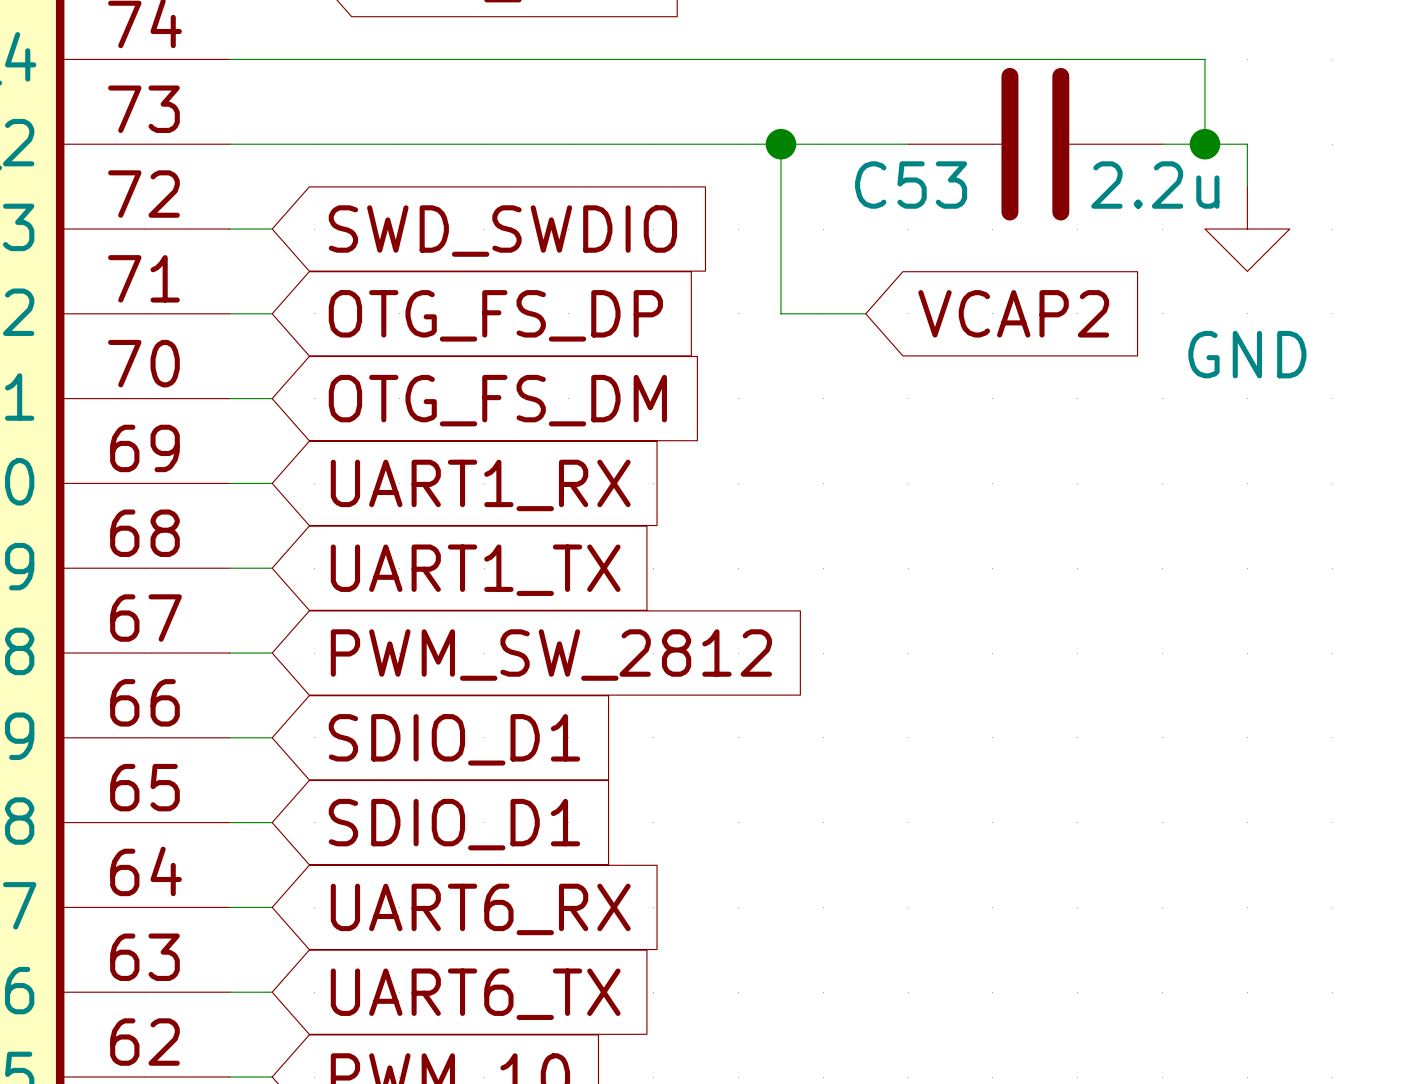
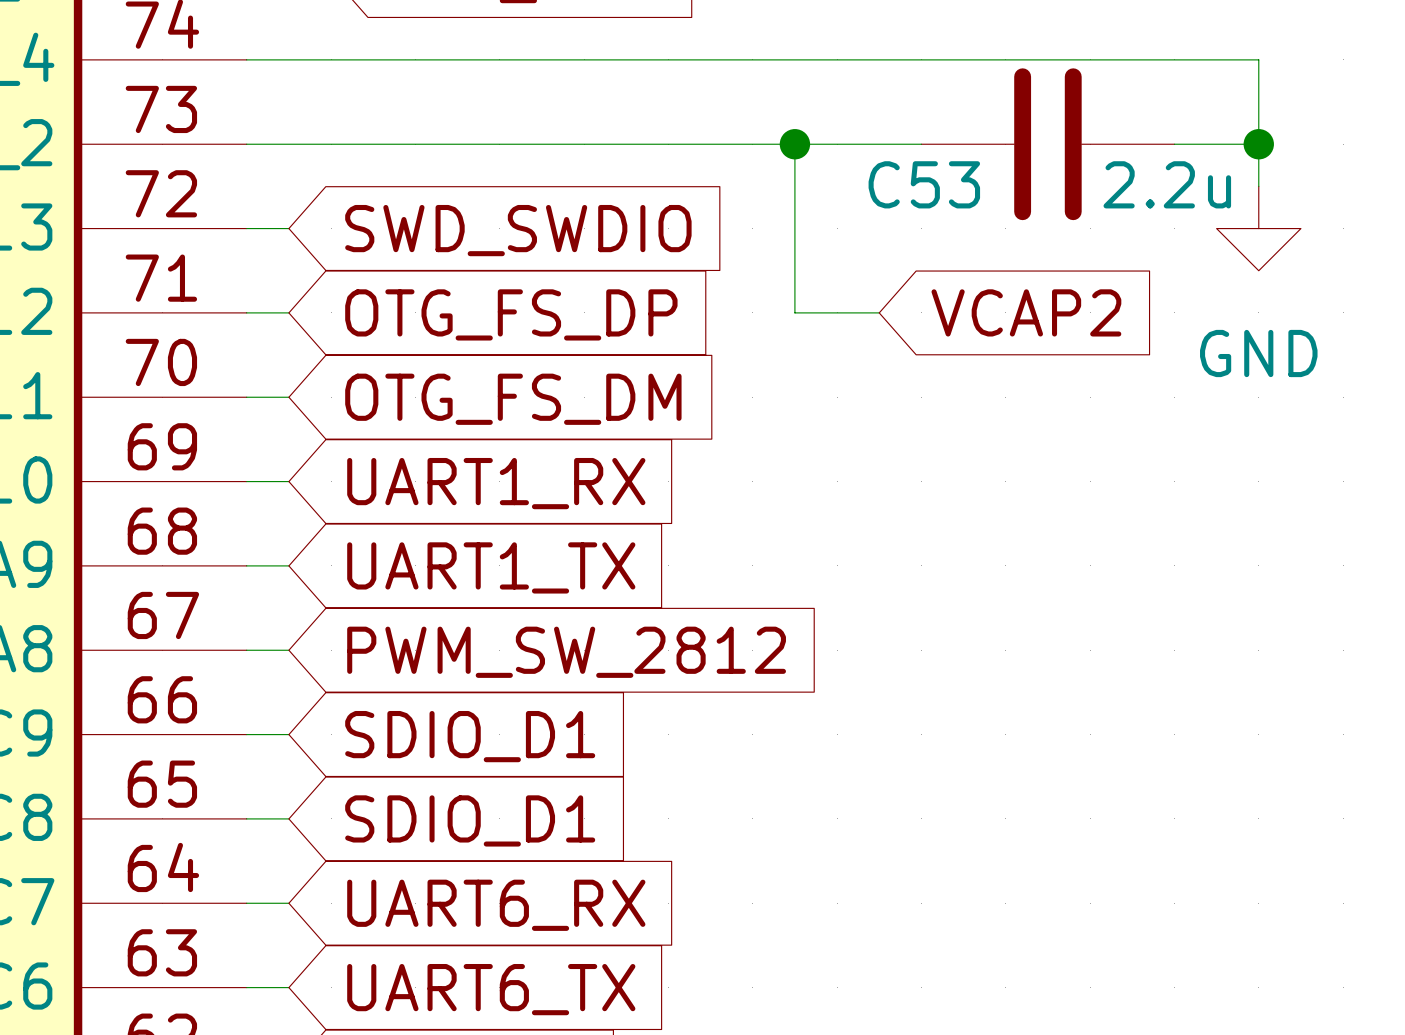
wire: (1204, 59) (1204, 144) -> (1216, 59) (1258, 59) (1258, 144)
junction position: (1204, 144) -> (1258, 144)

